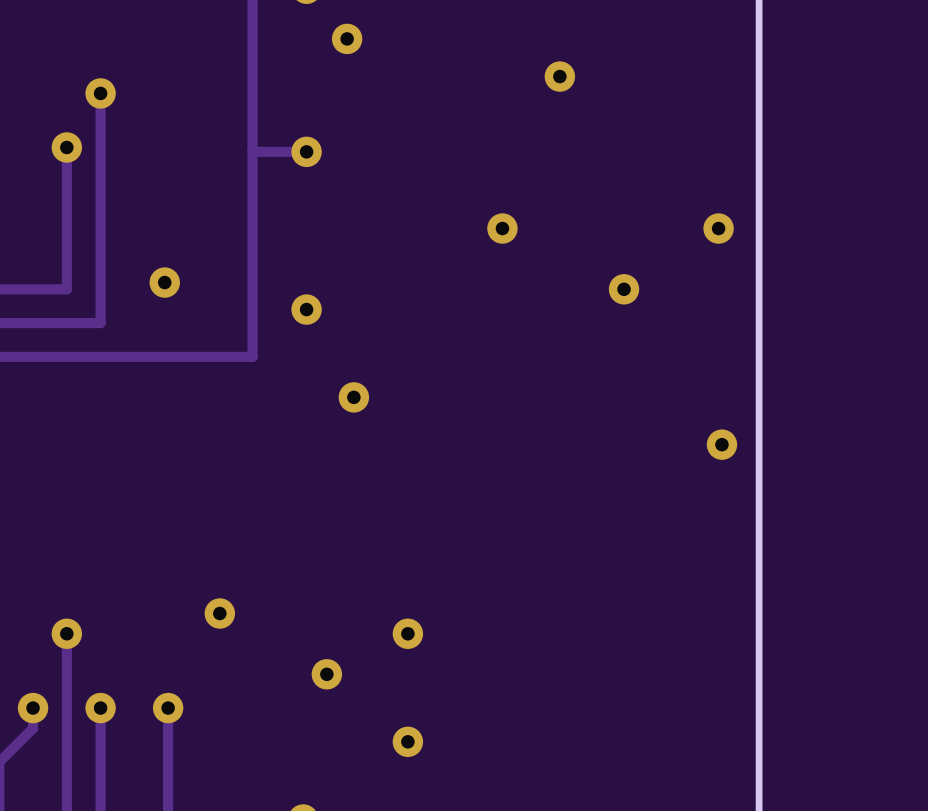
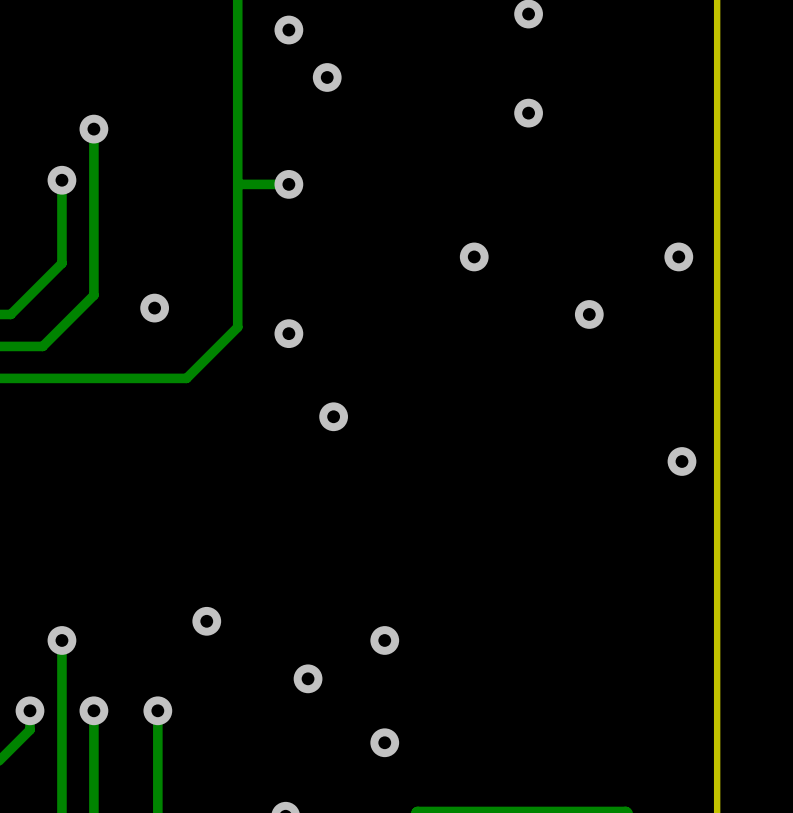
track: (66, 235) (66, 289) (12, 289) -> (61, 263) (10, 314)
track: (100, 269) (100, 323) (46, 323) -> (93, 295) (42, 346)
track: (252, 302) (252, 356) (198, 356) -> (237, 327) (186, 378)

